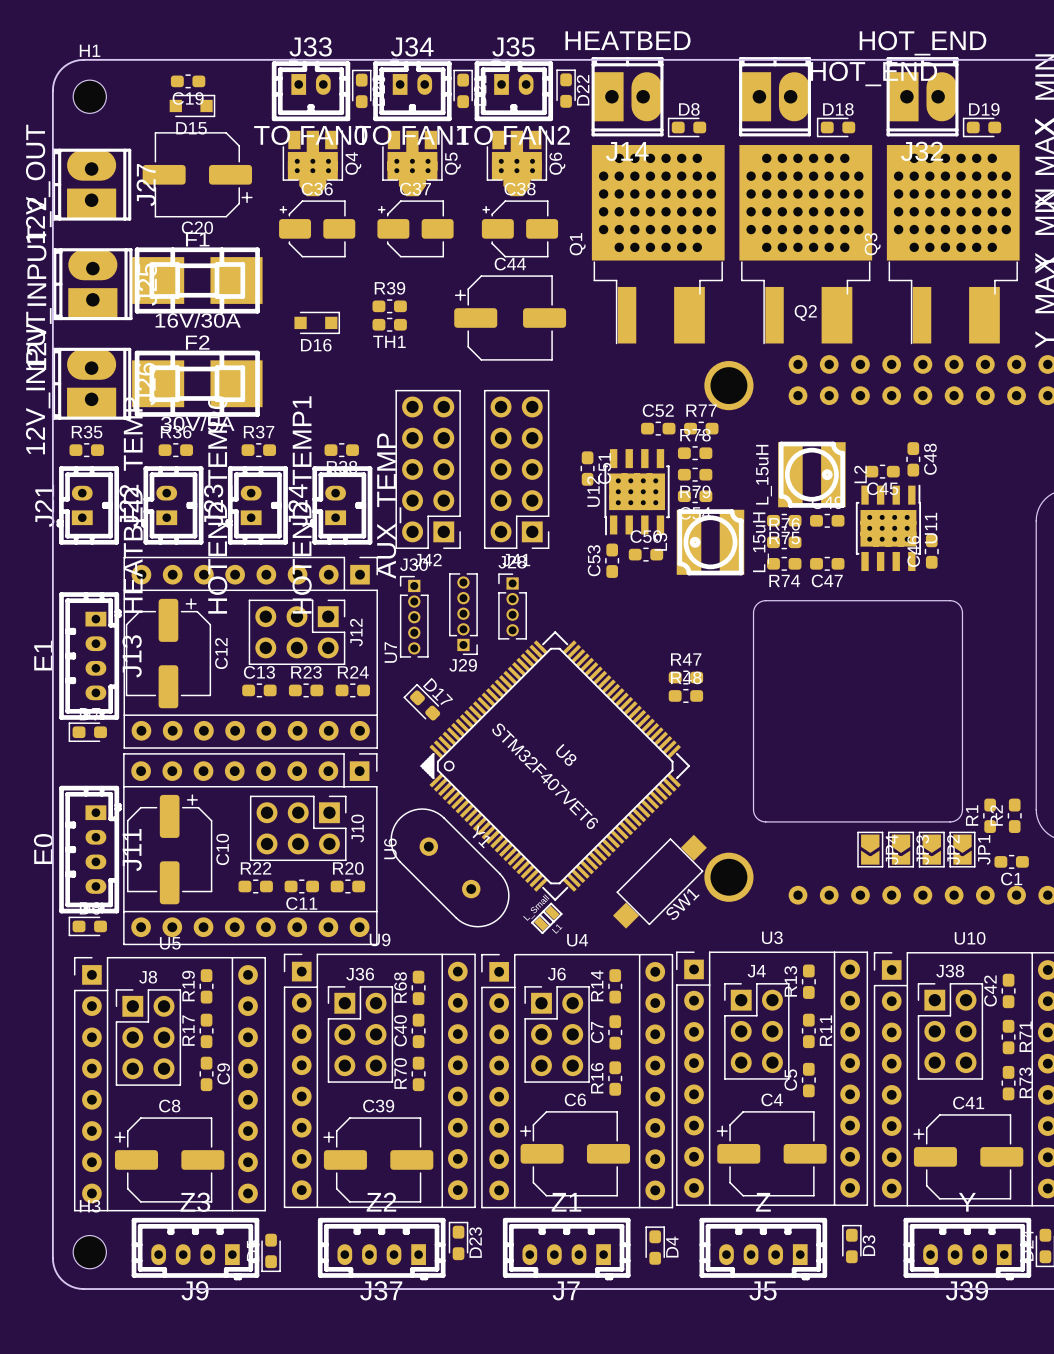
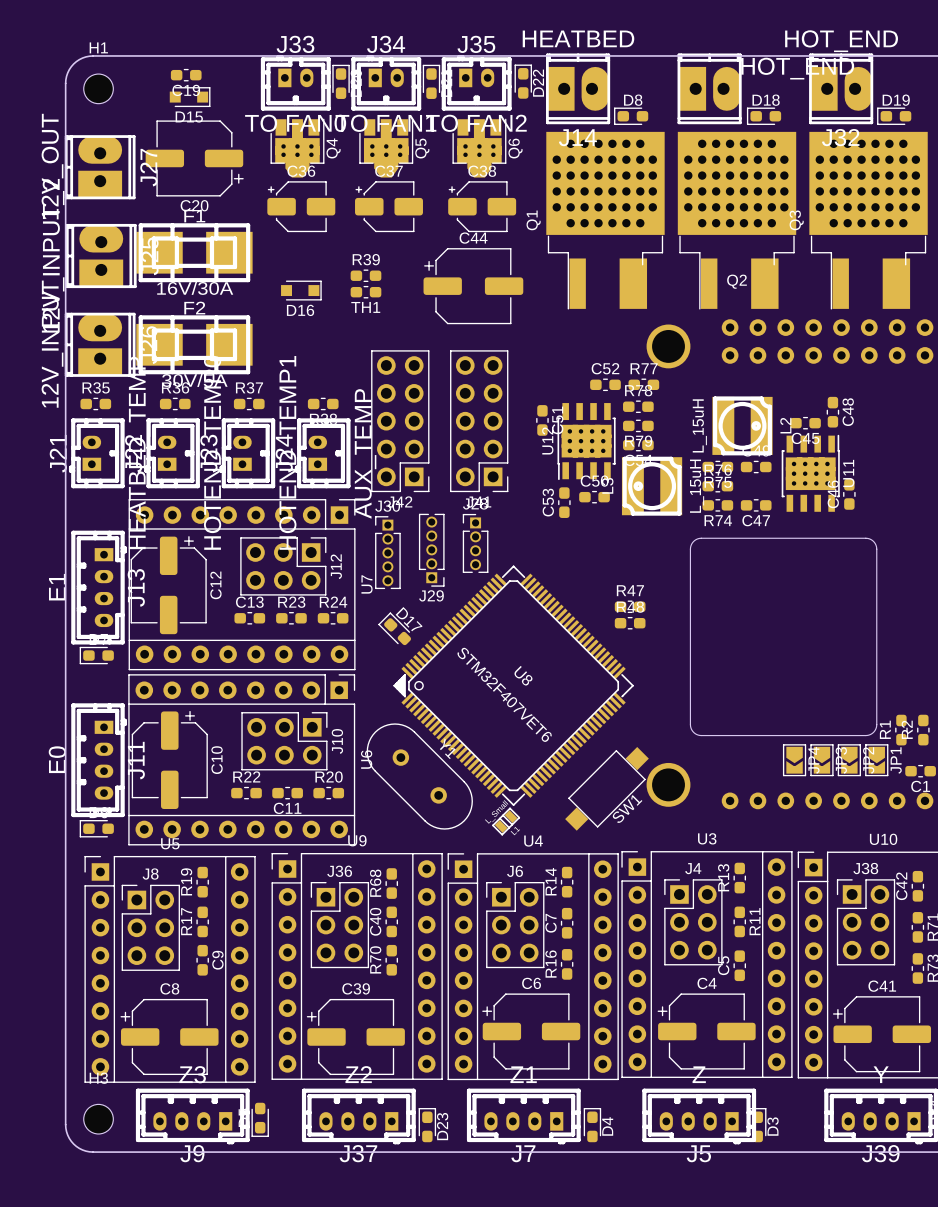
D23 position: (458, 1240) -> (427, 1125)
D3 position: (851, 1244) -> (757, 1125)
D4 position: (655, 1245) -> (592, 1125)

